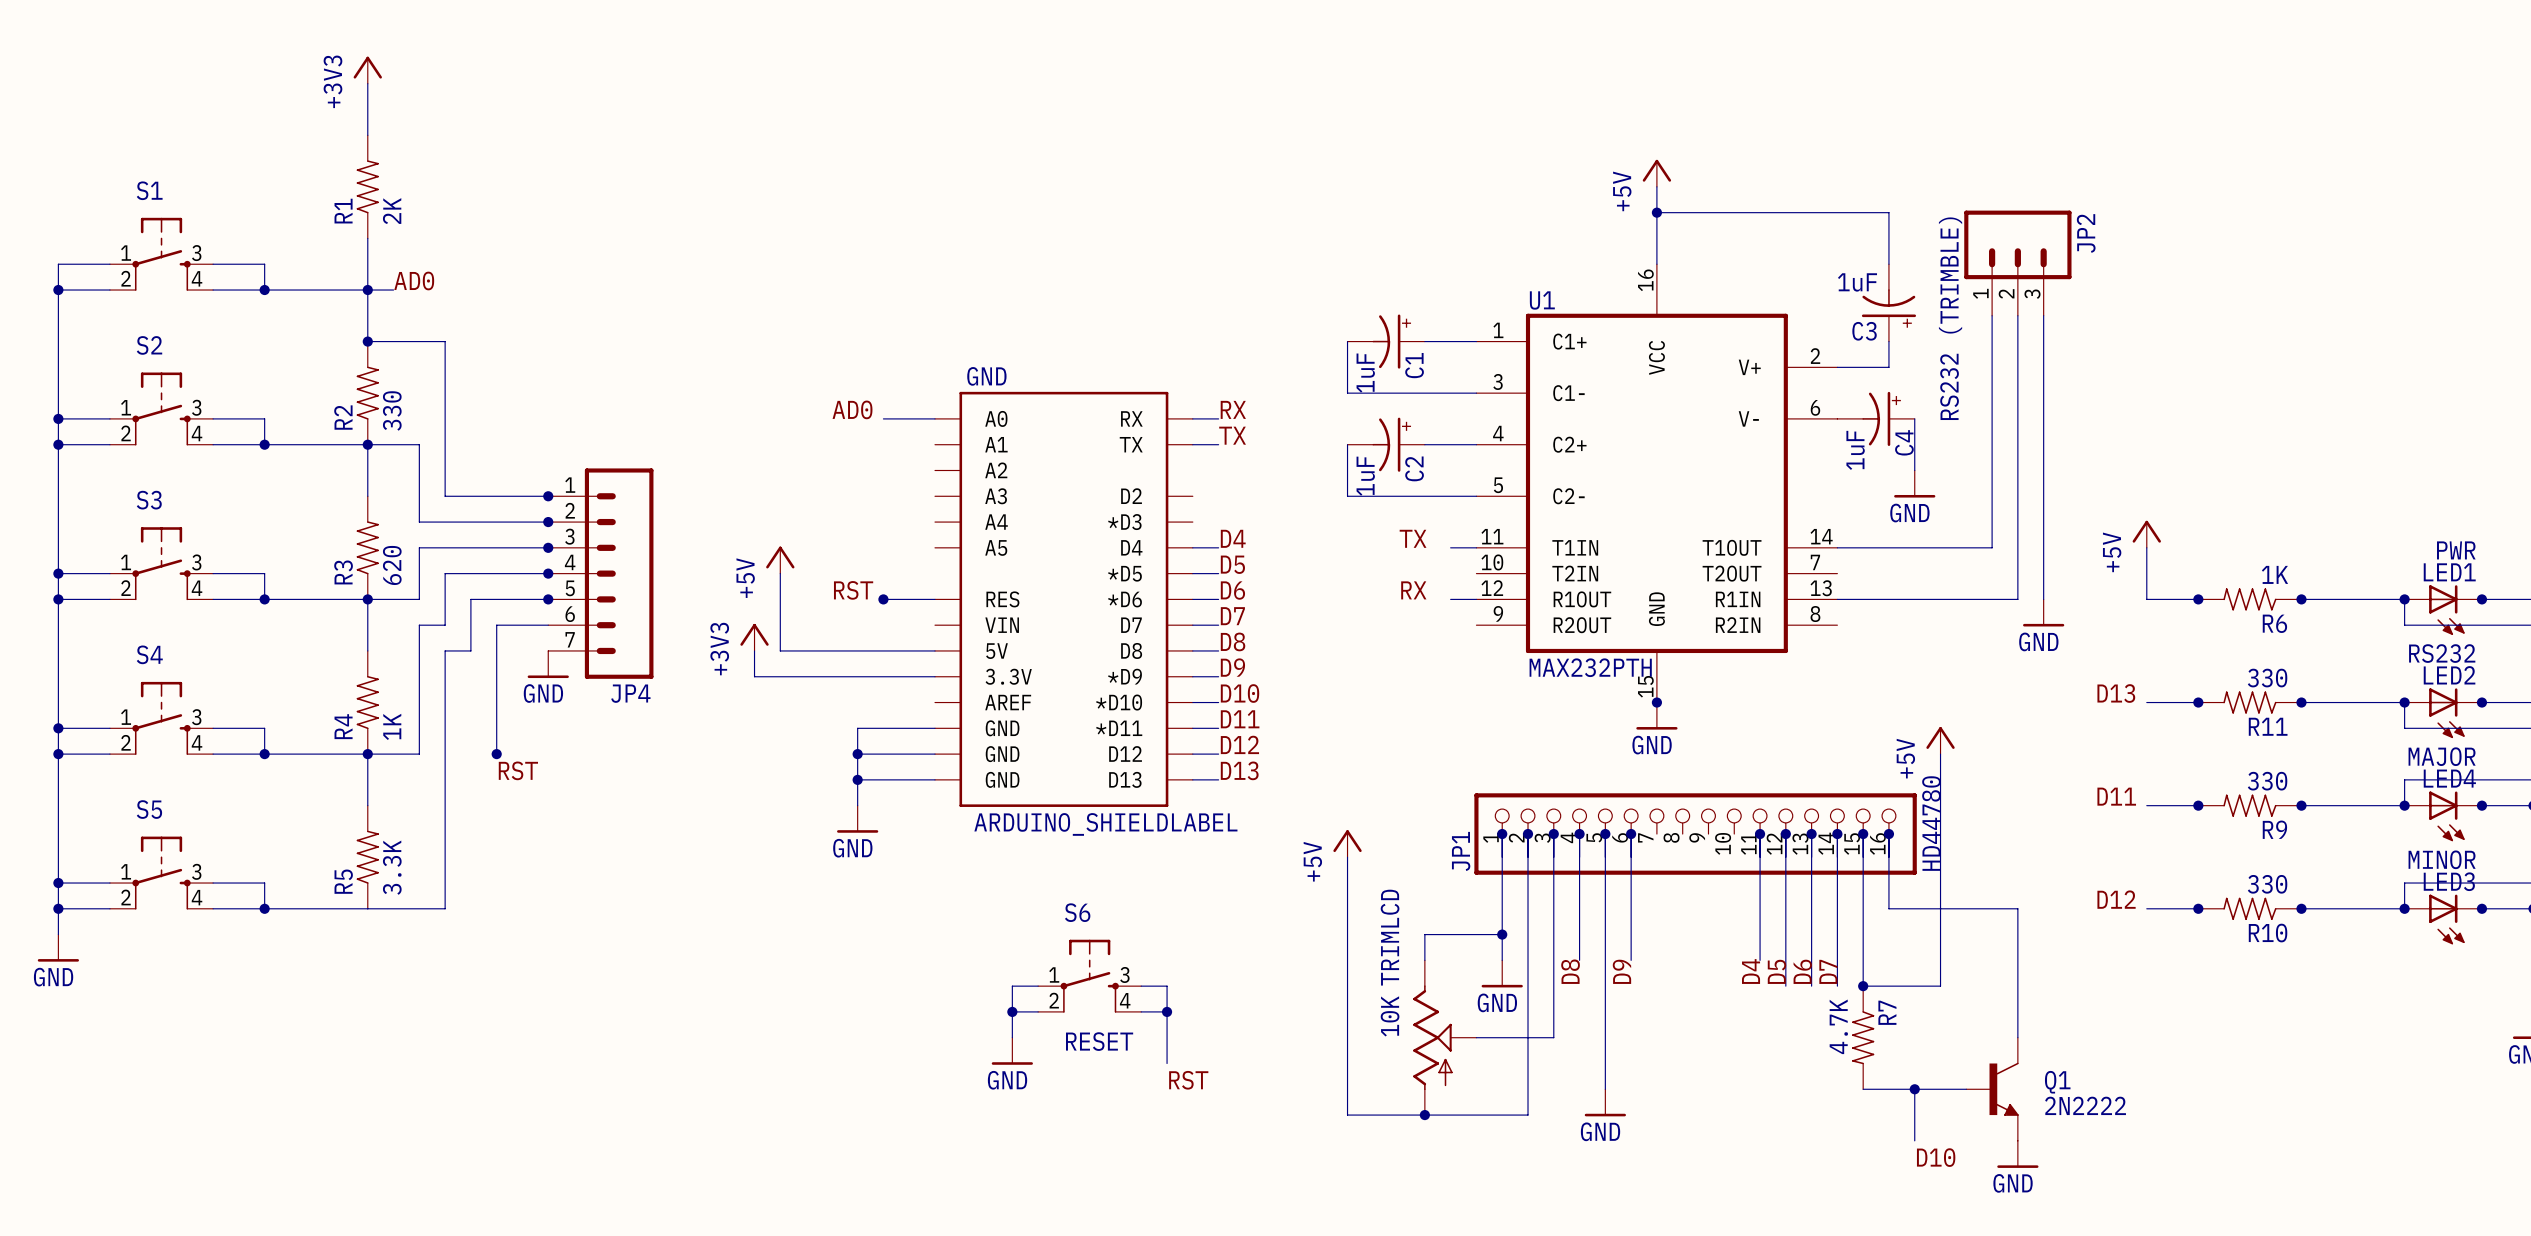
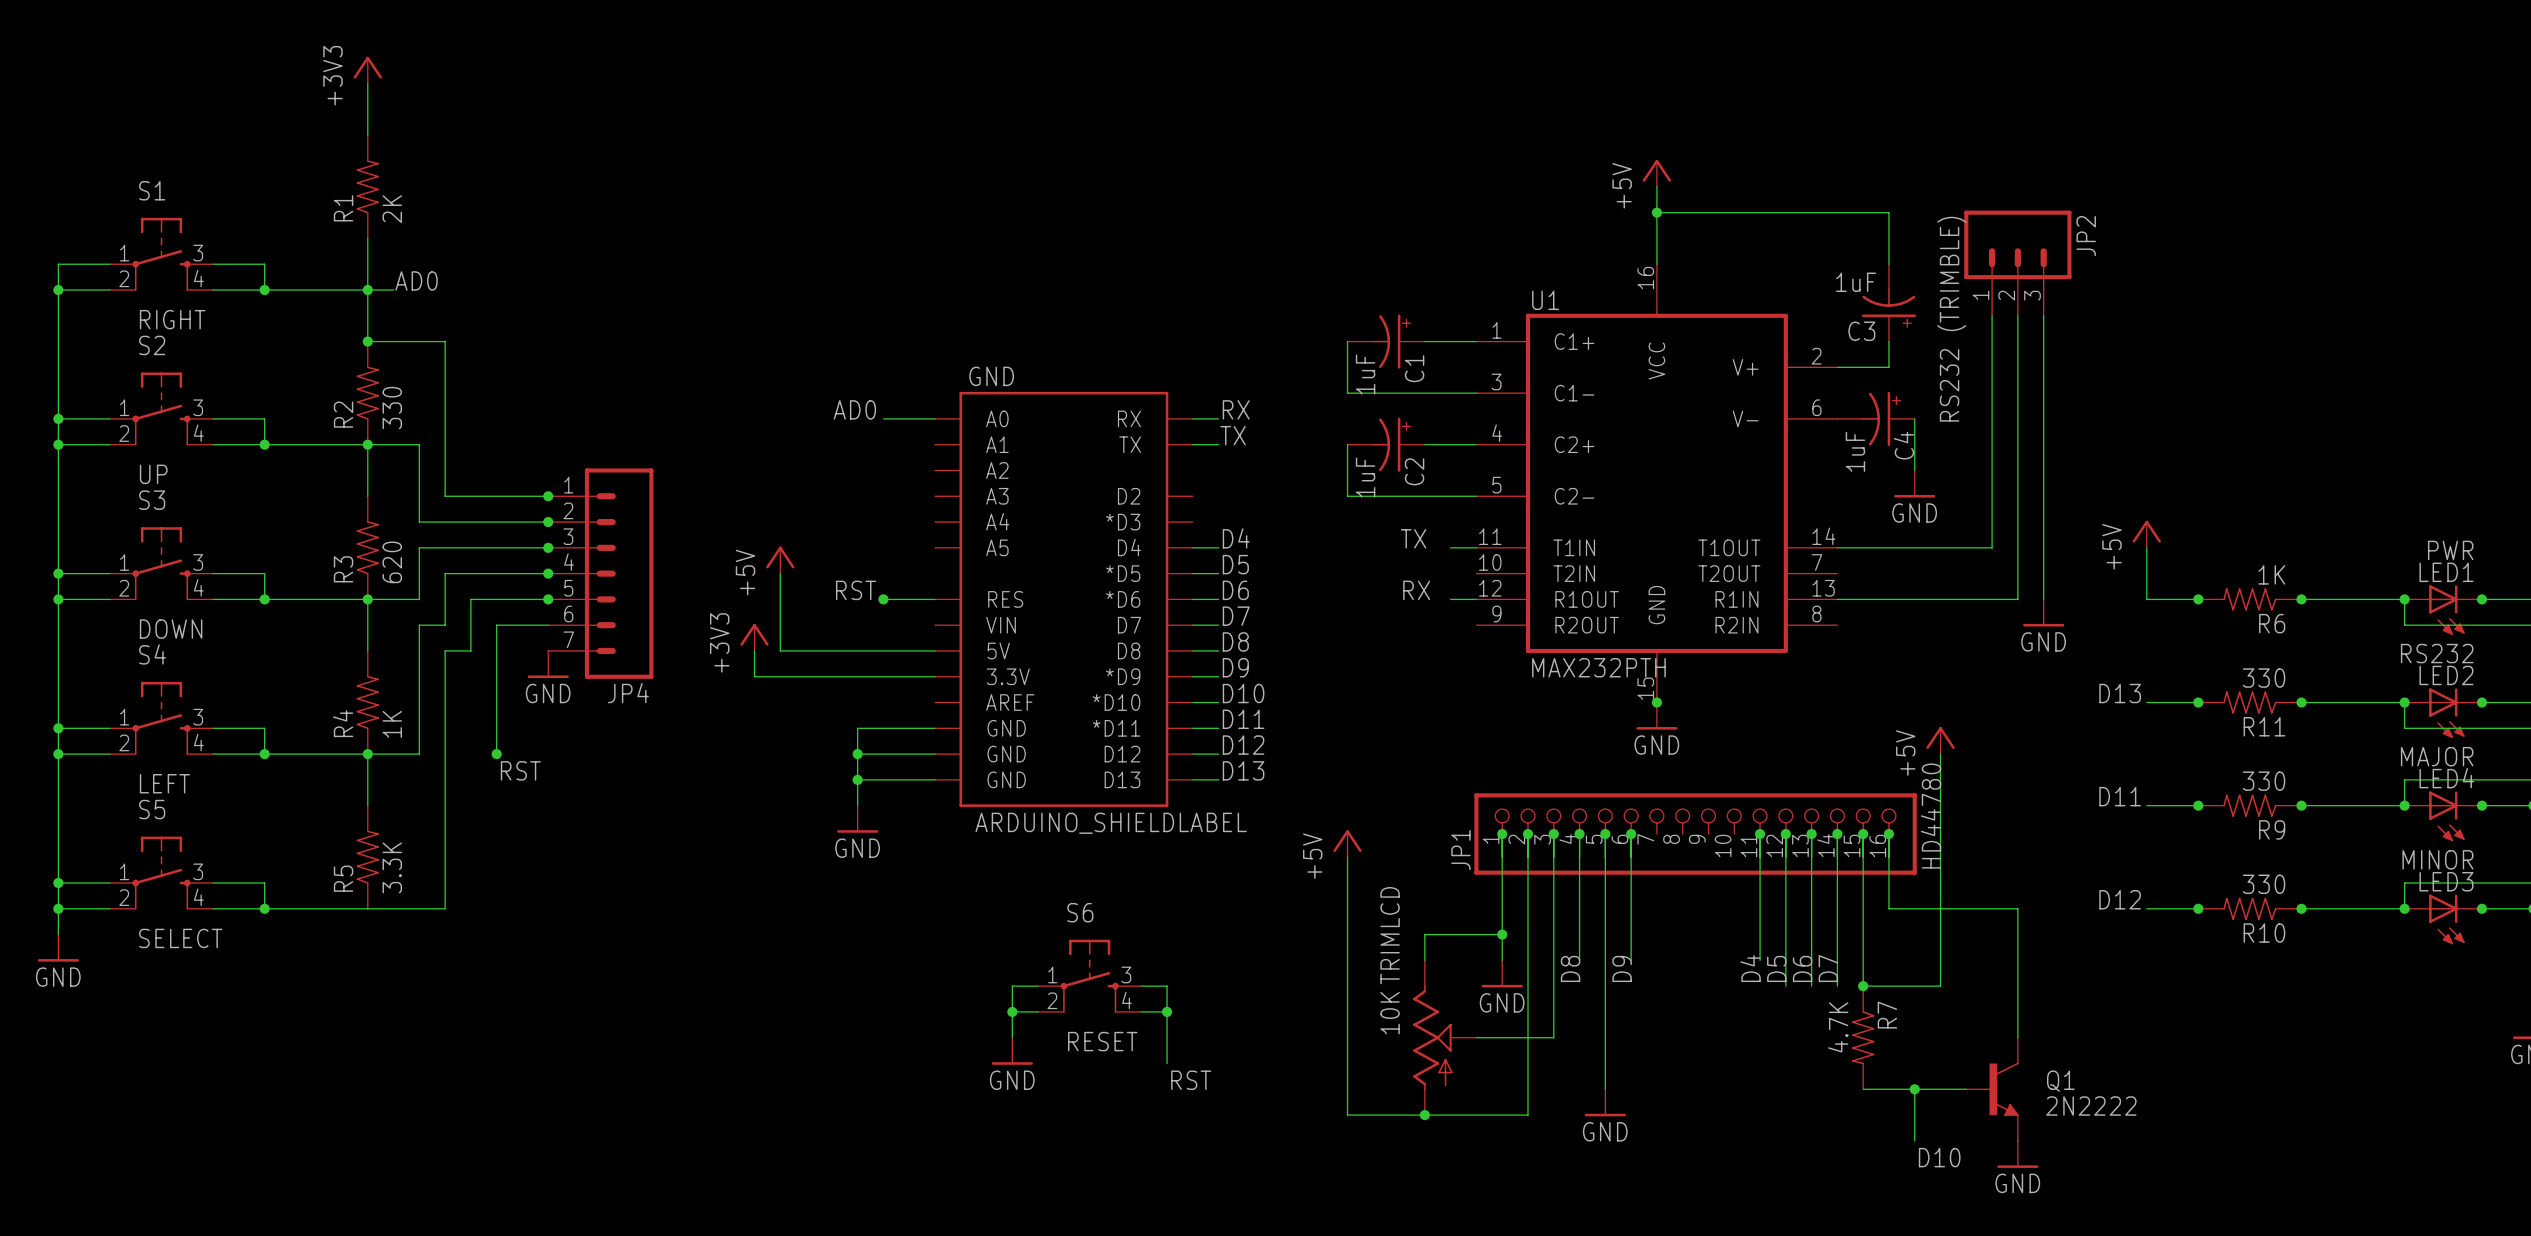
S1 value: none -> RIGHT (172, 319)
S2 value: none -> UP (153, 474)
S3 value: none -> DOWN (171, 629)
S4 value: none -> LEFT (164, 783)
S5 value: none -> SELECT (180, 938)

